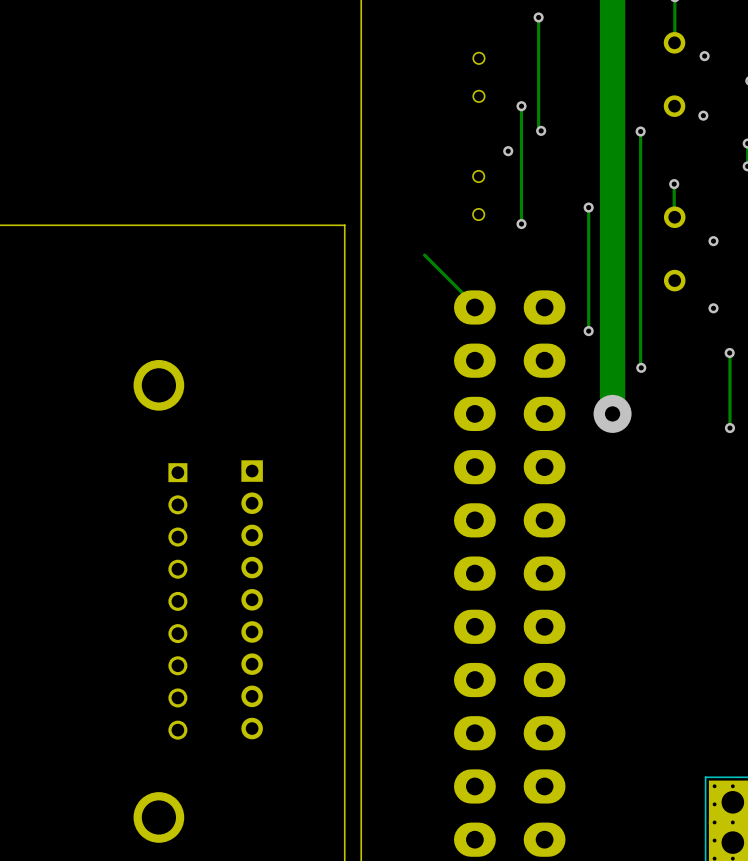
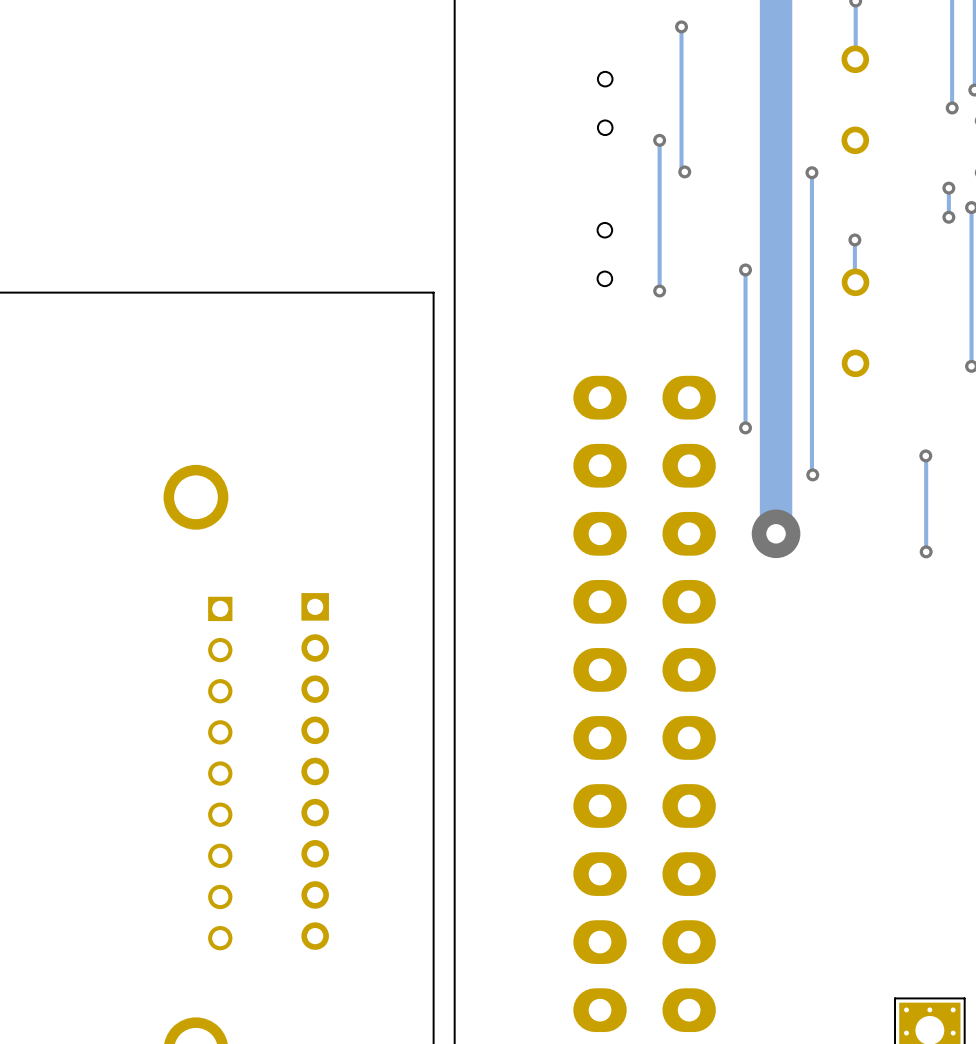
via: (704, 56) -> none
via: (703, 115) -> none
via: (508, 151) -> none
via: (713, 241) -> none
track: (424, 255) (474, 307) -> none
via: (713, 308) -> none

